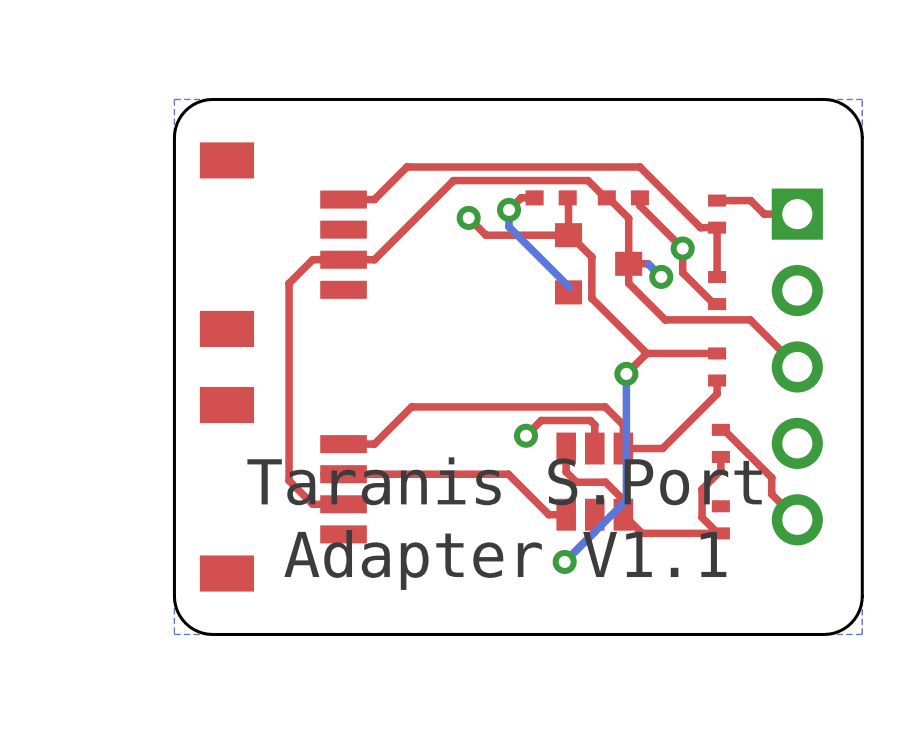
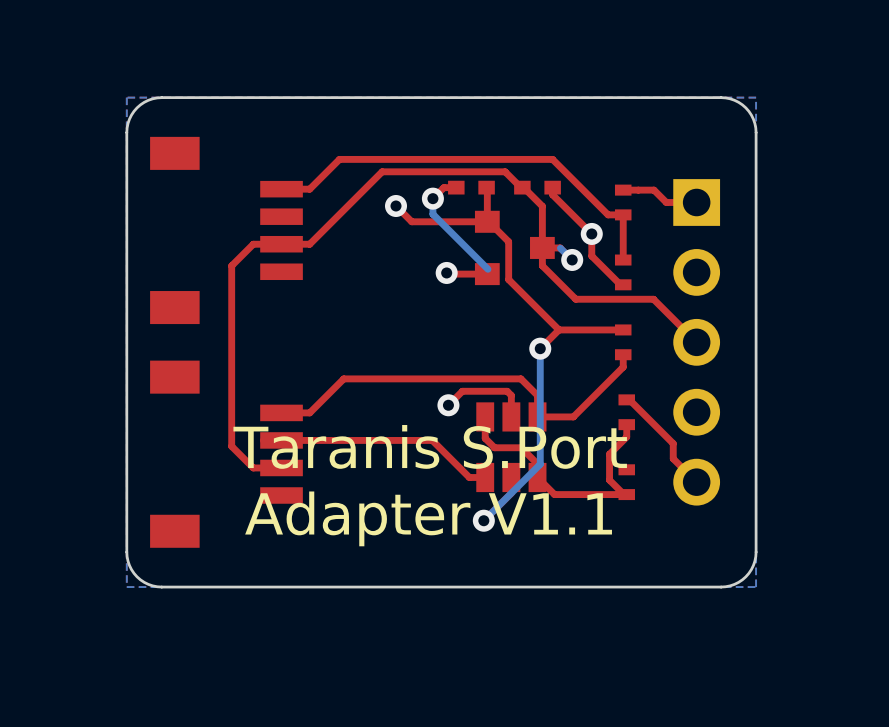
top track: none -> (446, 272) (485, 274)
via: none -> (446, 272)

